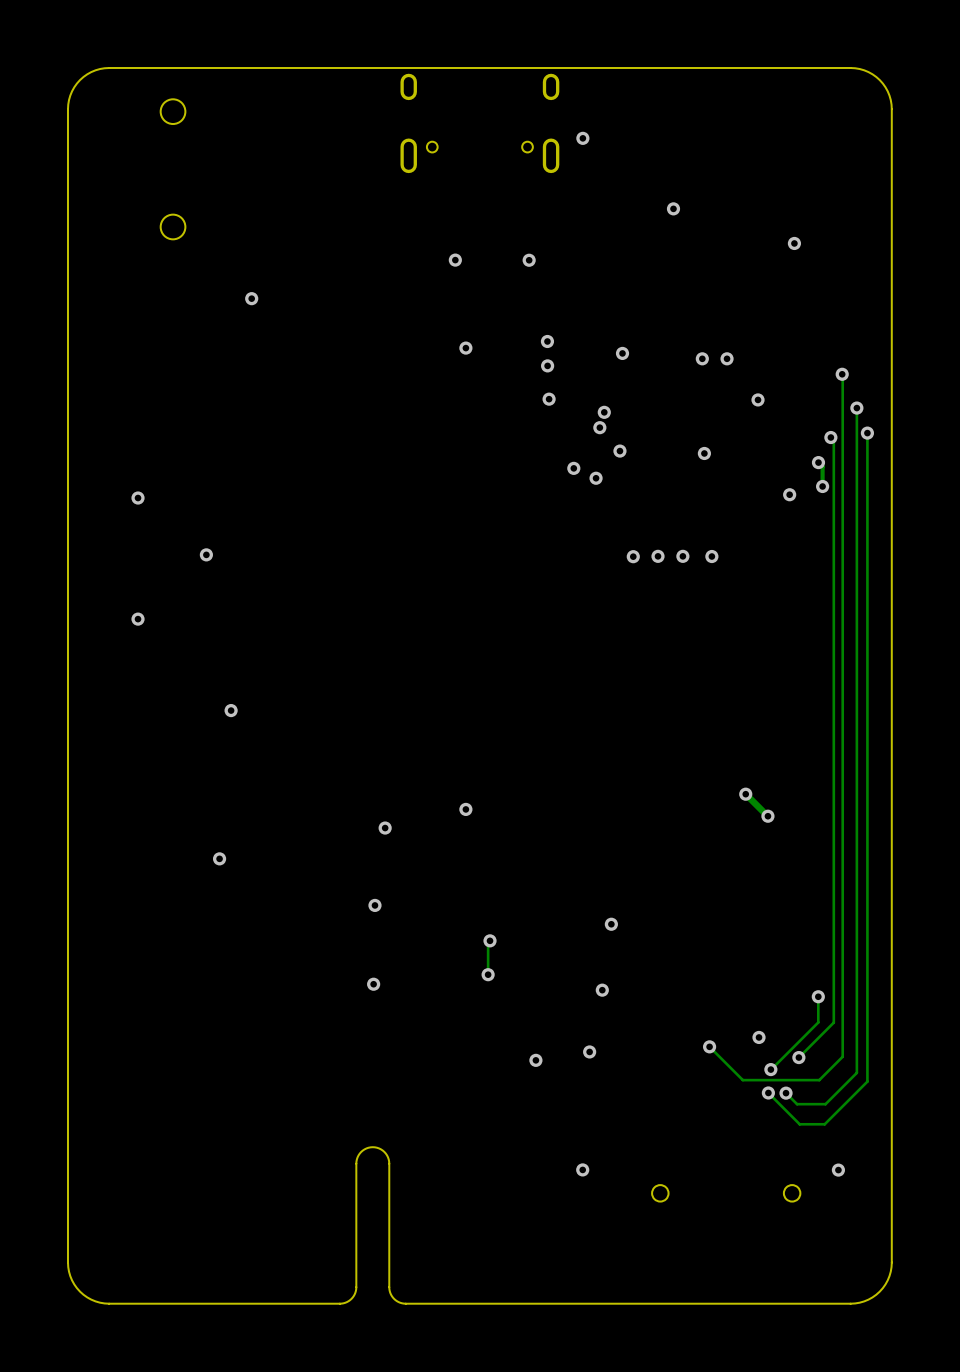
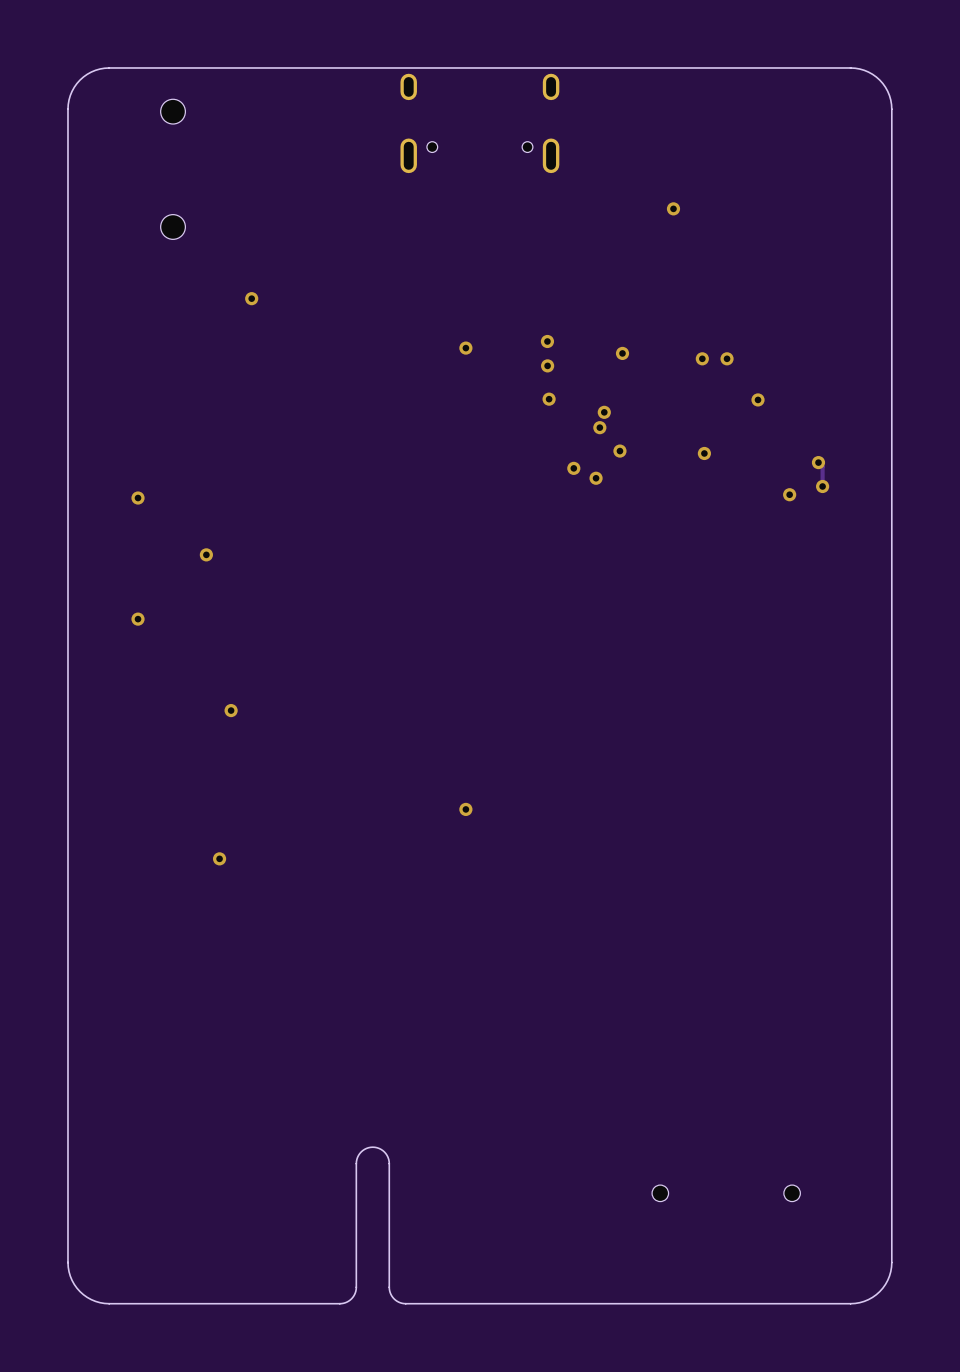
via: (582, 138) -> none
via: (794, 243) -> none
via: (455, 260) -> none
via: (529, 260) -> none
track: (842, 374) (842, 1056) (819, 1080) (742, 1080) (709, 1046) -> none
via: (842, 374) -> none
track: (856, 408) (856, 1072) (825, 1104) (797, 1104) (786, 1093) -> none
via: (856, 408) -> none
track: (867, 433) (867, 1081) (824, 1124) (799, 1124) (768, 1092) -> none
via: (867, 433) -> none
track: (830, 437) (833, 440) (833, 1022) (798, 1057) -> none
via: (830, 437) -> none
via: (633, 556) -> none
via: (658, 556) -> none
via: (682, 556) -> none
via: (711, 556) -> none
track: (745, 794) (767, 816) -> none
via: (745, 794) -> none
via: (767, 816) -> none
via: (385, 828) -> none
via: (374, 905) -> none
via: (611, 924) -> none
track: (490, 940) (488, 942) (488, 974) -> none
via: (490, 940) -> none
via: (488, 974) -> none
via: (373, 984) -> none
via: (602, 990) -> none
track: (818, 996) (818, 1022) (771, 1069) -> none
via: (818, 996) -> none
via: (759, 1037) -> none
via: (709, 1046) -> none
via: (589, 1051) -> none
via: (798, 1057) -> none
via: (535, 1060) -> none
via: (770, 1069) -> none
via: (768, 1092) -> none
via: (786, 1093) -> none
via: (582, 1169) -> none
via: (838, 1170) -> none

